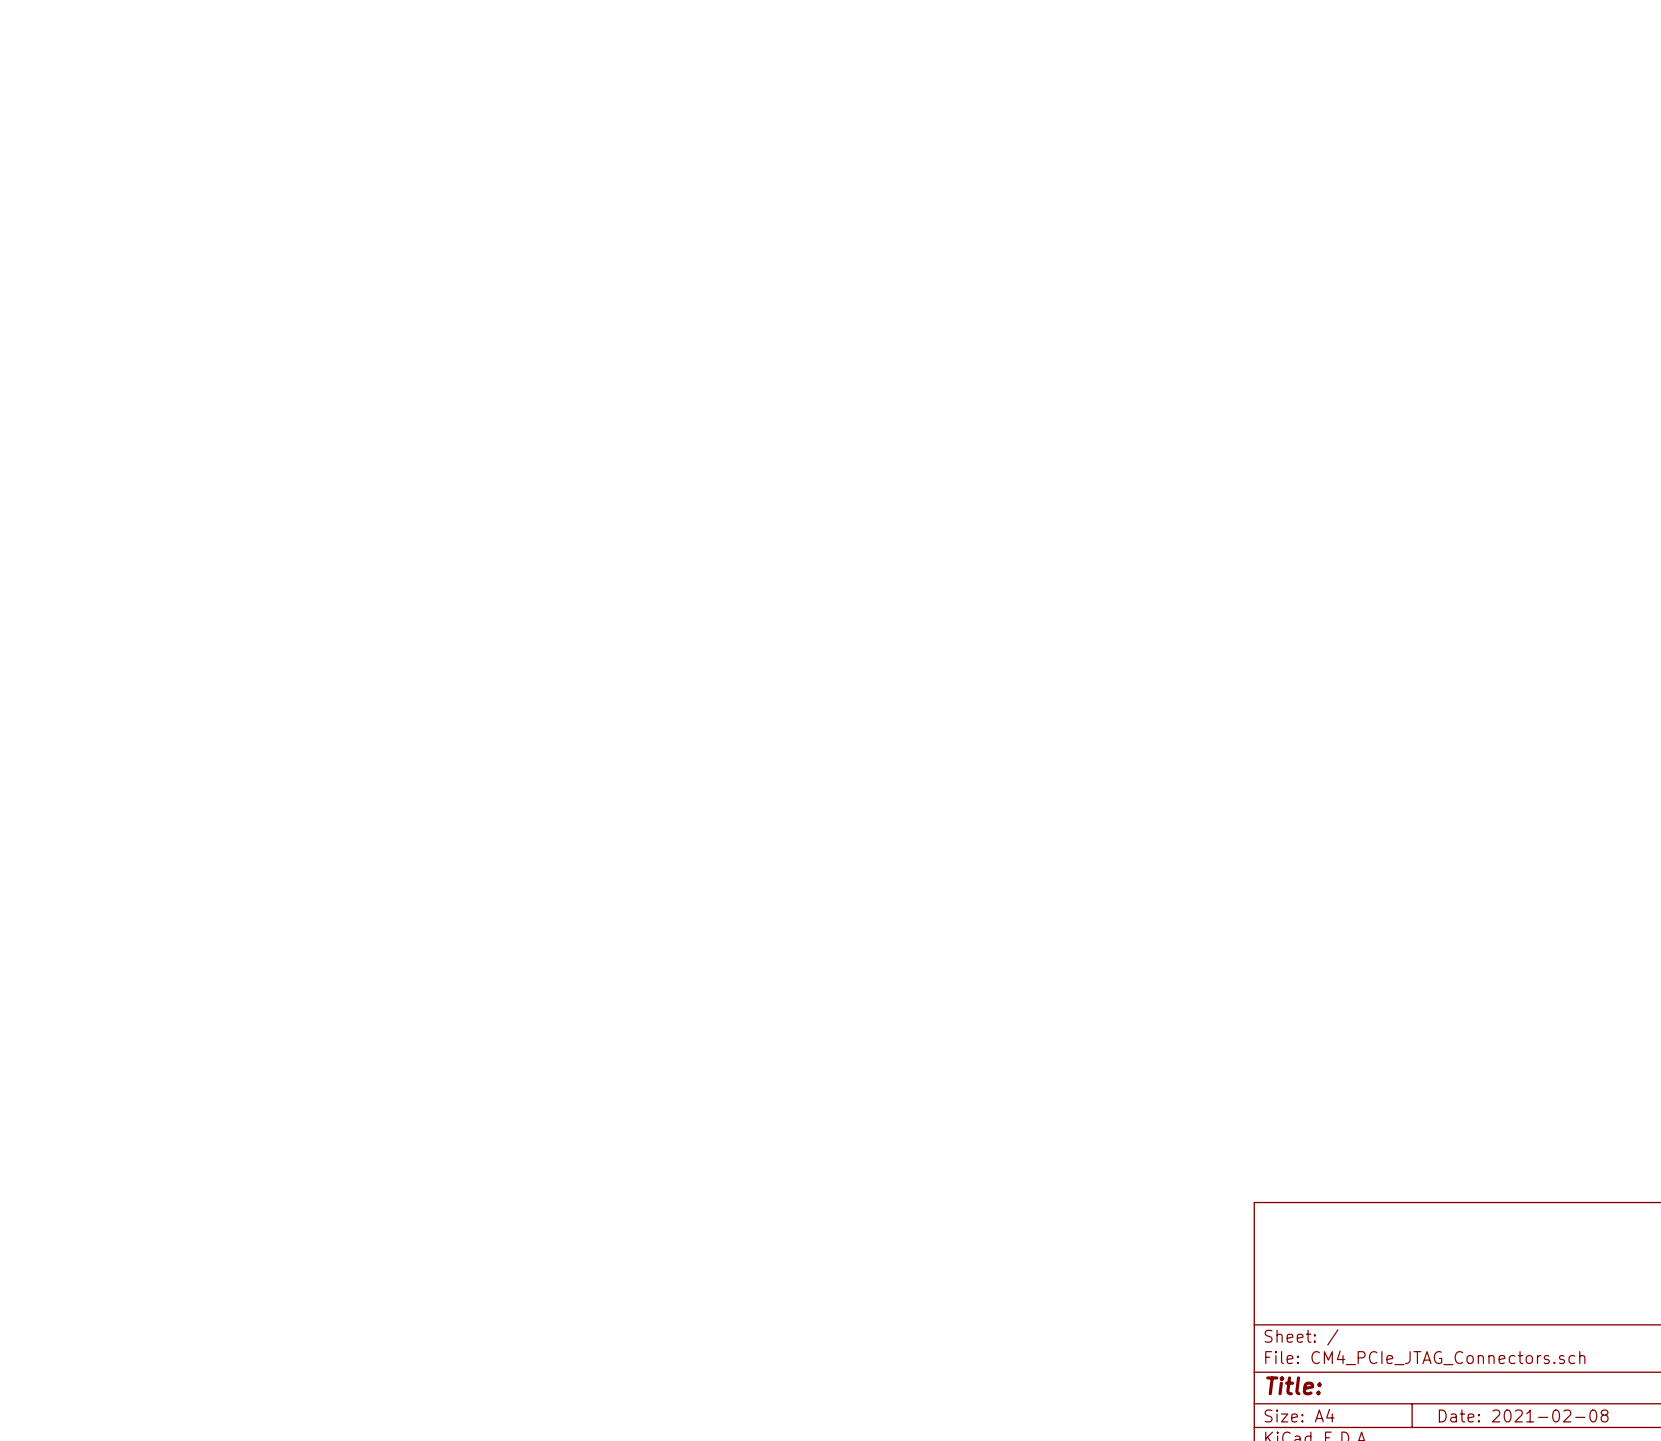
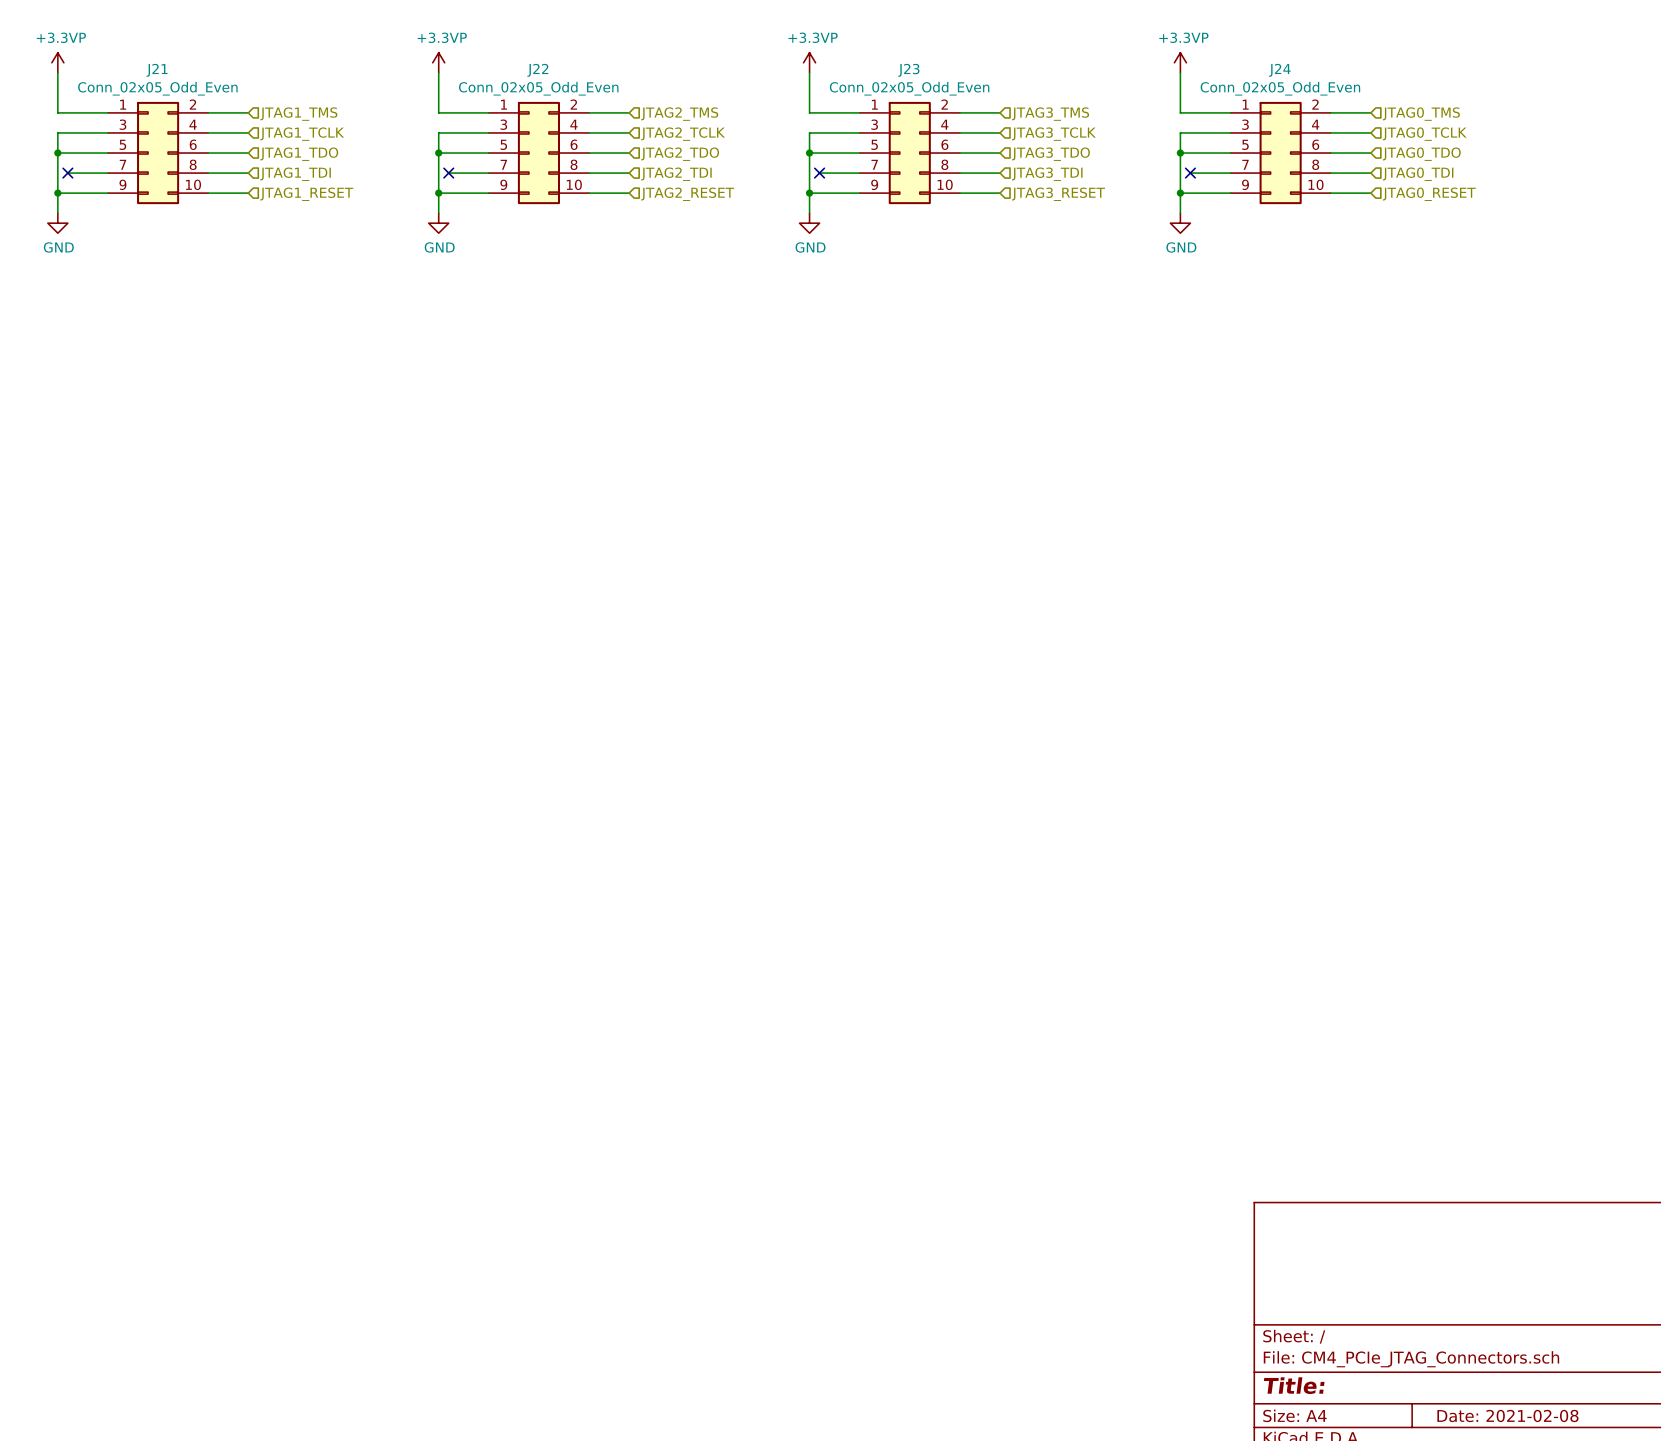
power symbol: none -> +3.3VP (57, 62)
power symbol: none -> +3.3VP (438, 62)
power symbol: none -> +3.3VP (809, 62)
power symbol: none -> +3.3VP (1180, 62)
wire: none -> (57, 72) (57, 112) (107, 112)
wire: none -> (438, 72) (438, 112) (488, 112)
wire: none -> (809, 72) (809, 112) (859, 112)
wire: none -> (1180, 72) (1180, 112) (1230, 112)
wire: none -> (208, 112) (248, 112)
wire: none -> (589, 112) (629, 112)
wire: none -> (959, 112) (999, 112)
wire: none -> (1330, 112) (1370, 112)
hierarchical label: none -> JTAG1_TMS (298, 114)
hierarchical label: none -> JTAG2_TMS (679, 114)
hierarchical label: none -> JTAG3_TMS (1050, 114)
hierarchical label: none -> JTAG0_TMS (1421, 114)
wire: none -> (107, 132) (57, 132) (57, 213)
wire: none -> (208, 132) (248, 132)
wire: none -> (488, 132) (438, 132) (438, 213)
wire: none -> (589, 132) (629, 132)
wire: none -> (859, 132) (809, 132) (809, 213)
wire: none -> (959, 132) (999, 132)
wire: none -> (1230, 132) (1180, 132) (1180, 213)
wire: none -> (1330, 132) (1370, 132)
hierarchical label: none -> JTAG1_TCLK (302, 134)
hierarchical label: none -> JTAG2_TCLK (683, 134)
hierarchical label: none -> JTAG3_TCLK (1053, 134)
hierarchical label: none -> JTAG0_TCLK (1424, 134)
wire: none -> (57, 153) (107, 153)
junction: none -> (57, 153)
J21: none -> Conn_02x05_Odd_Even (158, 153)
wire: none -> (208, 153) (248, 153)
hierarchical label: none -> JTAG1_TDO (299, 154)
wire: none -> (438, 153) (488, 153)
junction: none -> (438, 153)
J22: none -> Conn_02x05_Odd_Even (538, 153)
wire: none -> (589, 153) (629, 153)
hierarchical label: none -> JTAG2_TDO (680, 154)
wire: none -> (809, 153) (859, 153)
junction: none -> (809, 153)
J23: none -> Conn_02x05_Odd_Even (909, 153)
wire: none -> (959, 153) (999, 153)
hierarchical label: none -> JTAG3_TDO (1050, 154)
wire: none -> (1180, 153) (1230, 153)
junction: none -> (1180, 153)
J24: none -> Conn_02x05_Odd_Even (1280, 153)
wire: none -> (1330, 153) (1370, 153)
hierarchical label: none -> JTAG0_TDO (1421, 154)
wire: none -> (67, 173) (107, 173)
no-connect mark: none -> (67, 173)
wire: none -> (208, 173) (248, 173)
hierarchical label: none -> JTAG1_TDI (295, 174)
wire: none -> (448, 173) (488, 173)
no-connect mark: none -> (448, 173)
wire: none -> (589, 173) (629, 173)
hierarchical label: none -> JTAG2_TDI (676, 174)
wire: none -> (819, 173) (859, 173)
no-connect mark: none -> (819, 173)
wire: none -> (959, 173) (999, 173)
hierarchical label: none -> JTAG3_TDI (1047, 174)
wire: none -> (1190, 173) (1230, 173)
no-connect mark: none -> (1190, 173)
wire: none -> (1330, 173) (1370, 173)
hierarchical label: none -> JTAG0_TDI (1418, 174)
wire: none -> (57, 193) (107, 193)
junction: none -> (57, 193)
wire: none -> (208, 193) (248, 193)
hierarchical label: none -> JTAG1_RESET (306, 194)
wire: none -> (438, 193) (488, 193)
junction: none -> (438, 193)
wire: none -> (589, 193) (629, 193)
hierarchical label: none -> JTAG2_RESET (687, 194)
wire: none -> (809, 193) (859, 193)
junction: none -> (809, 193)
wire: none -> (959, 193) (999, 193)
hierarchical label: none -> JTAG3_RESET (1058, 194)
wire: none -> (1180, 193) (1230, 193)
junction: none -> (1180, 193)
wire: none -> (1330, 193) (1370, 193)
hierarchical label: none -> JTAG0_RESET (1429, 194)
power symbol: none -> GND (57, 223)
power symbol: none -> GND (438, 223)
power symbol: none -> GND (809, 223)
power symbol: none -> GND (1180, 223)

